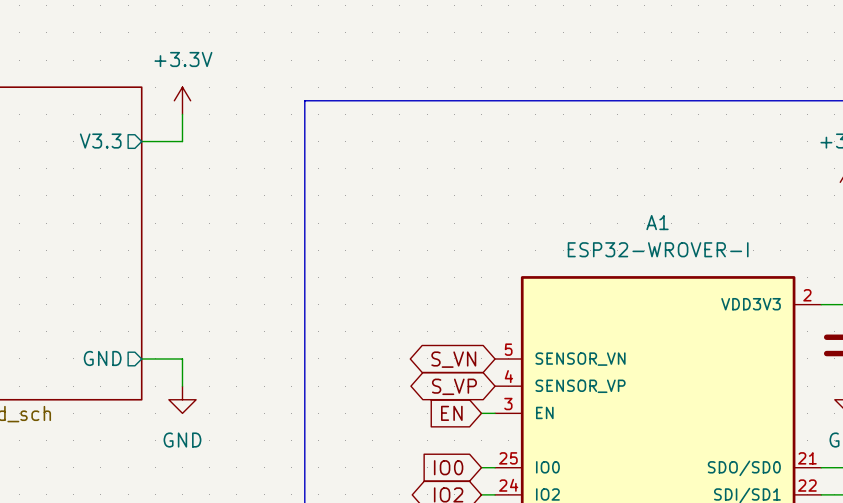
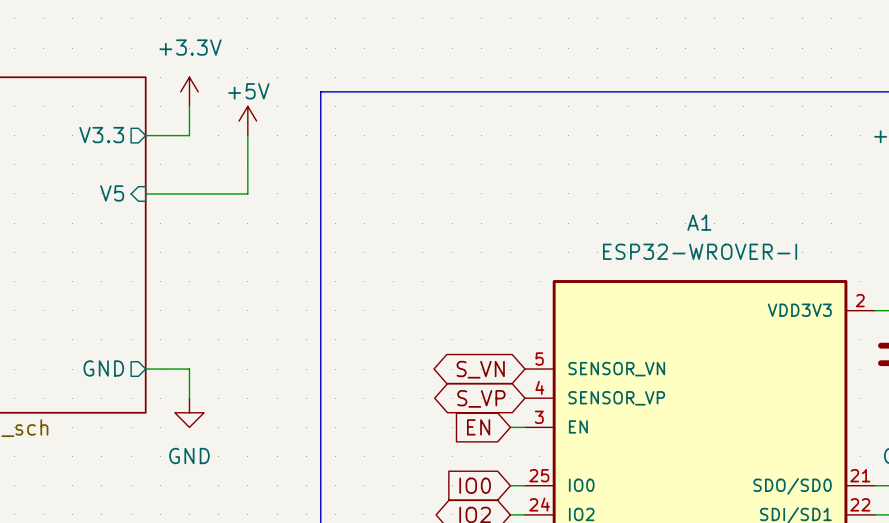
power symbol: none -> +5V (247, 121)
wire: none -> (247, 135) (247, 193) (145, 193)
sheet pin: none -> V5 (112, 193)

